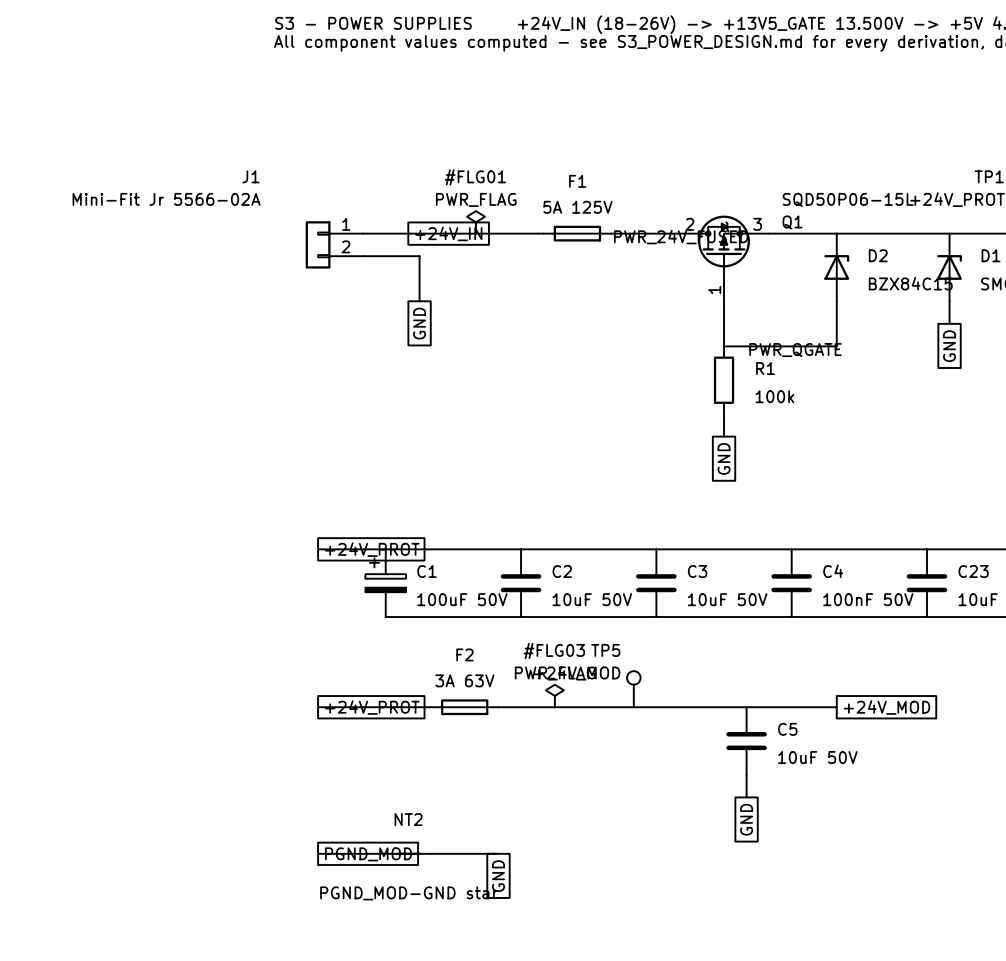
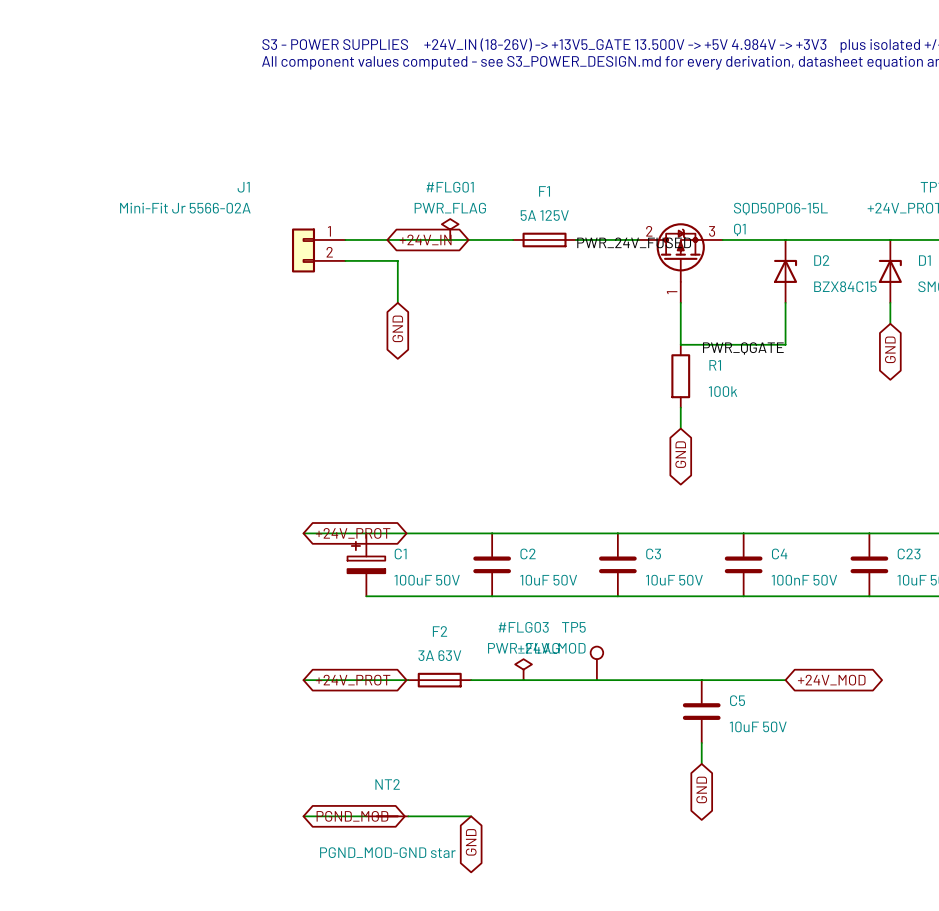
global label shape: passive (448, 233) -> bidirectional (425, 239)
global label shape: passive (419, 323) -> bidirectional (397, 328)
global label shape: passive (949, 346) -> bidirectional (890, 349)
global label shape: passive (724, 458) -> bidirectional (680, 454)
global label shape: passive (372, 549) -> bidirectional (353, 533)
global label shape: passive (372, 707) -> bidirectional (353, 680)
global label shape: passive (887, 707) -> bidirectional (831, 680)
global label shape: passive (746, 819) -> bidirectional (701, 789)
global label shape: passive (368, 854) -> bidirectional (352, 816)
global label shape: passive (498, 876) -> bidirectional (471, 842)

